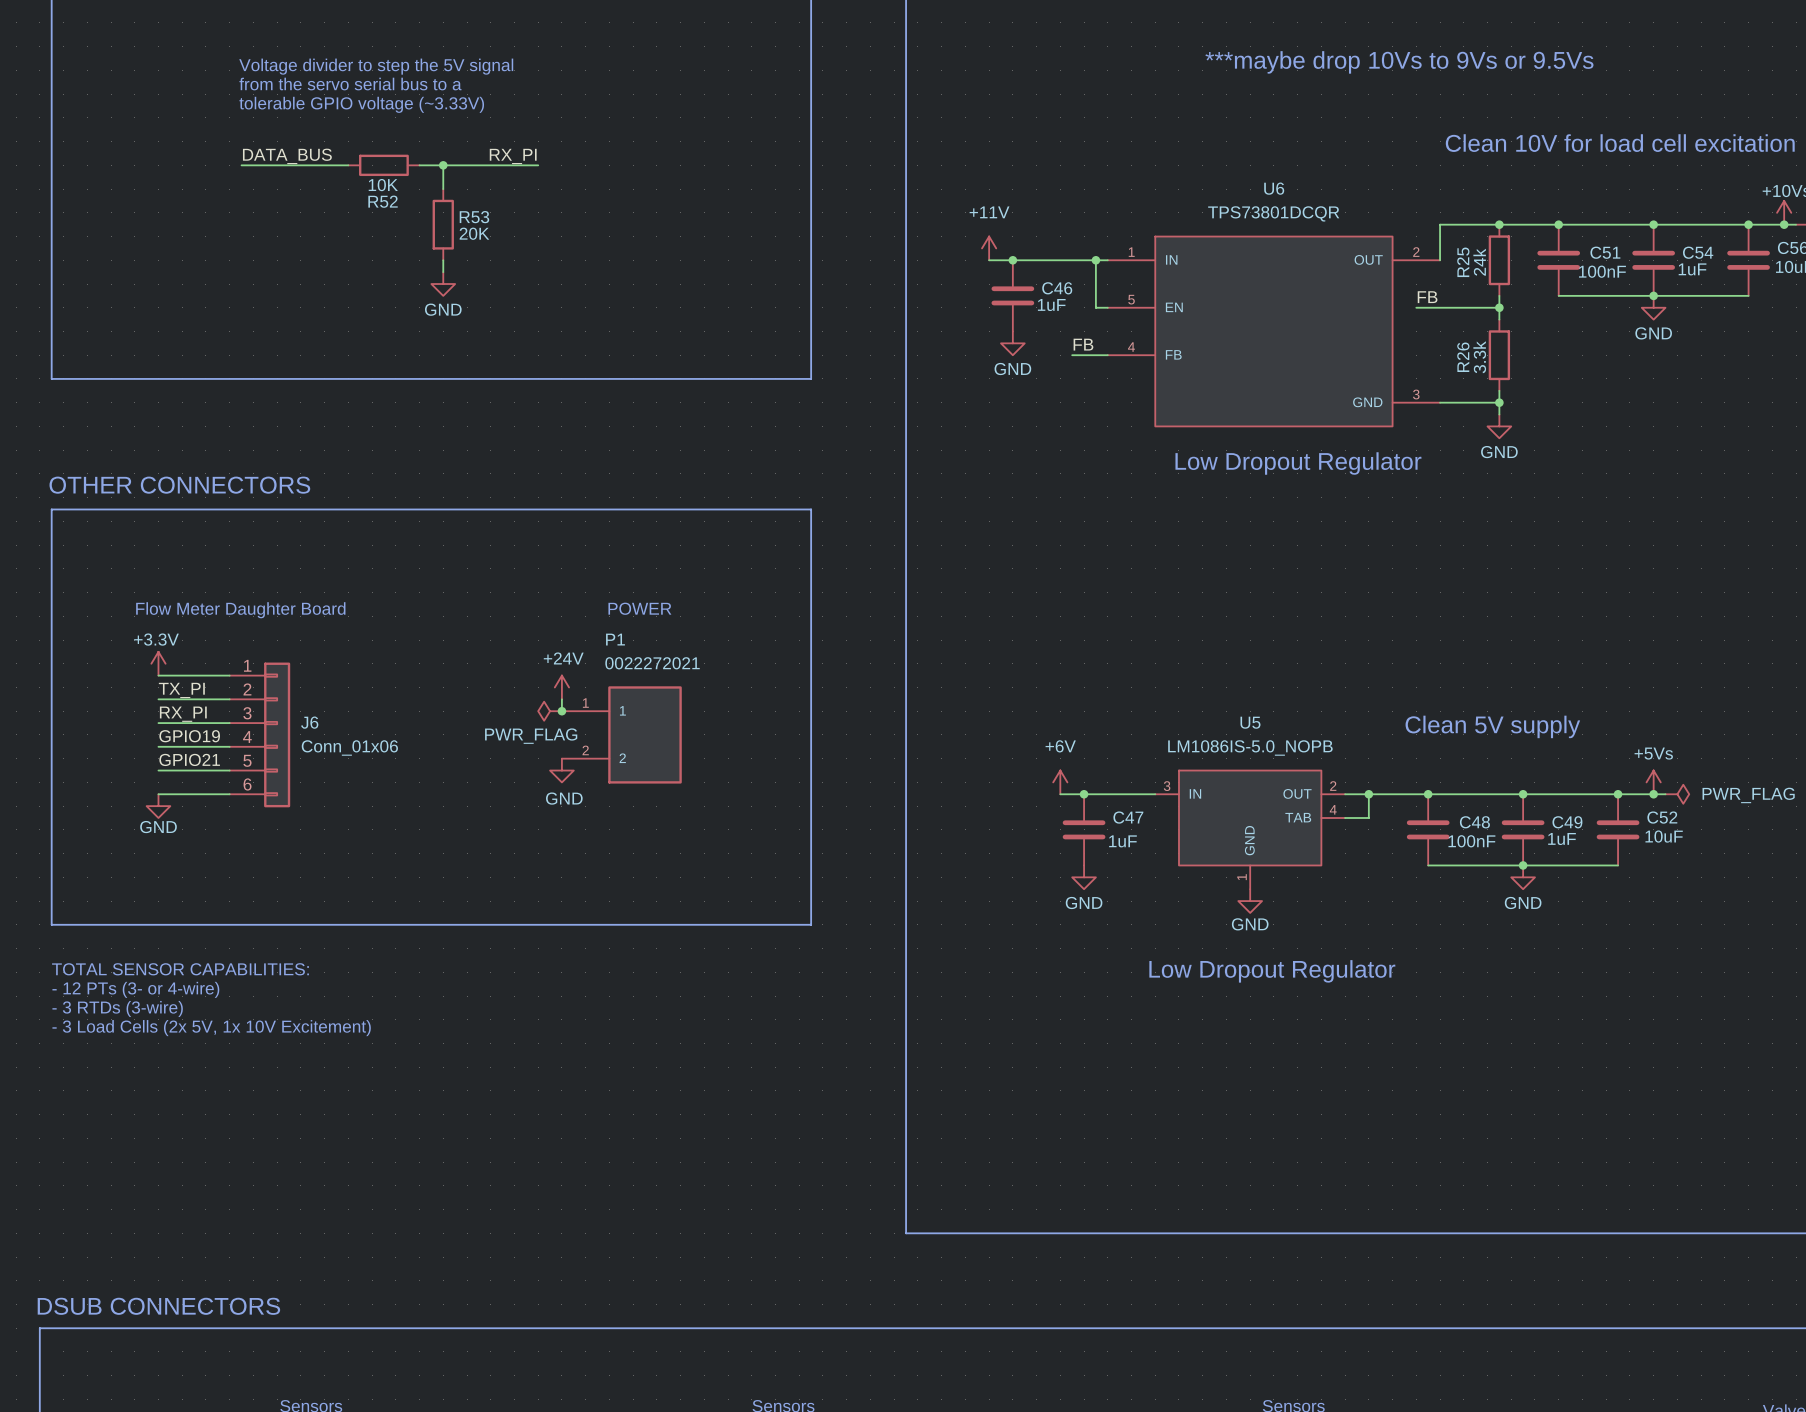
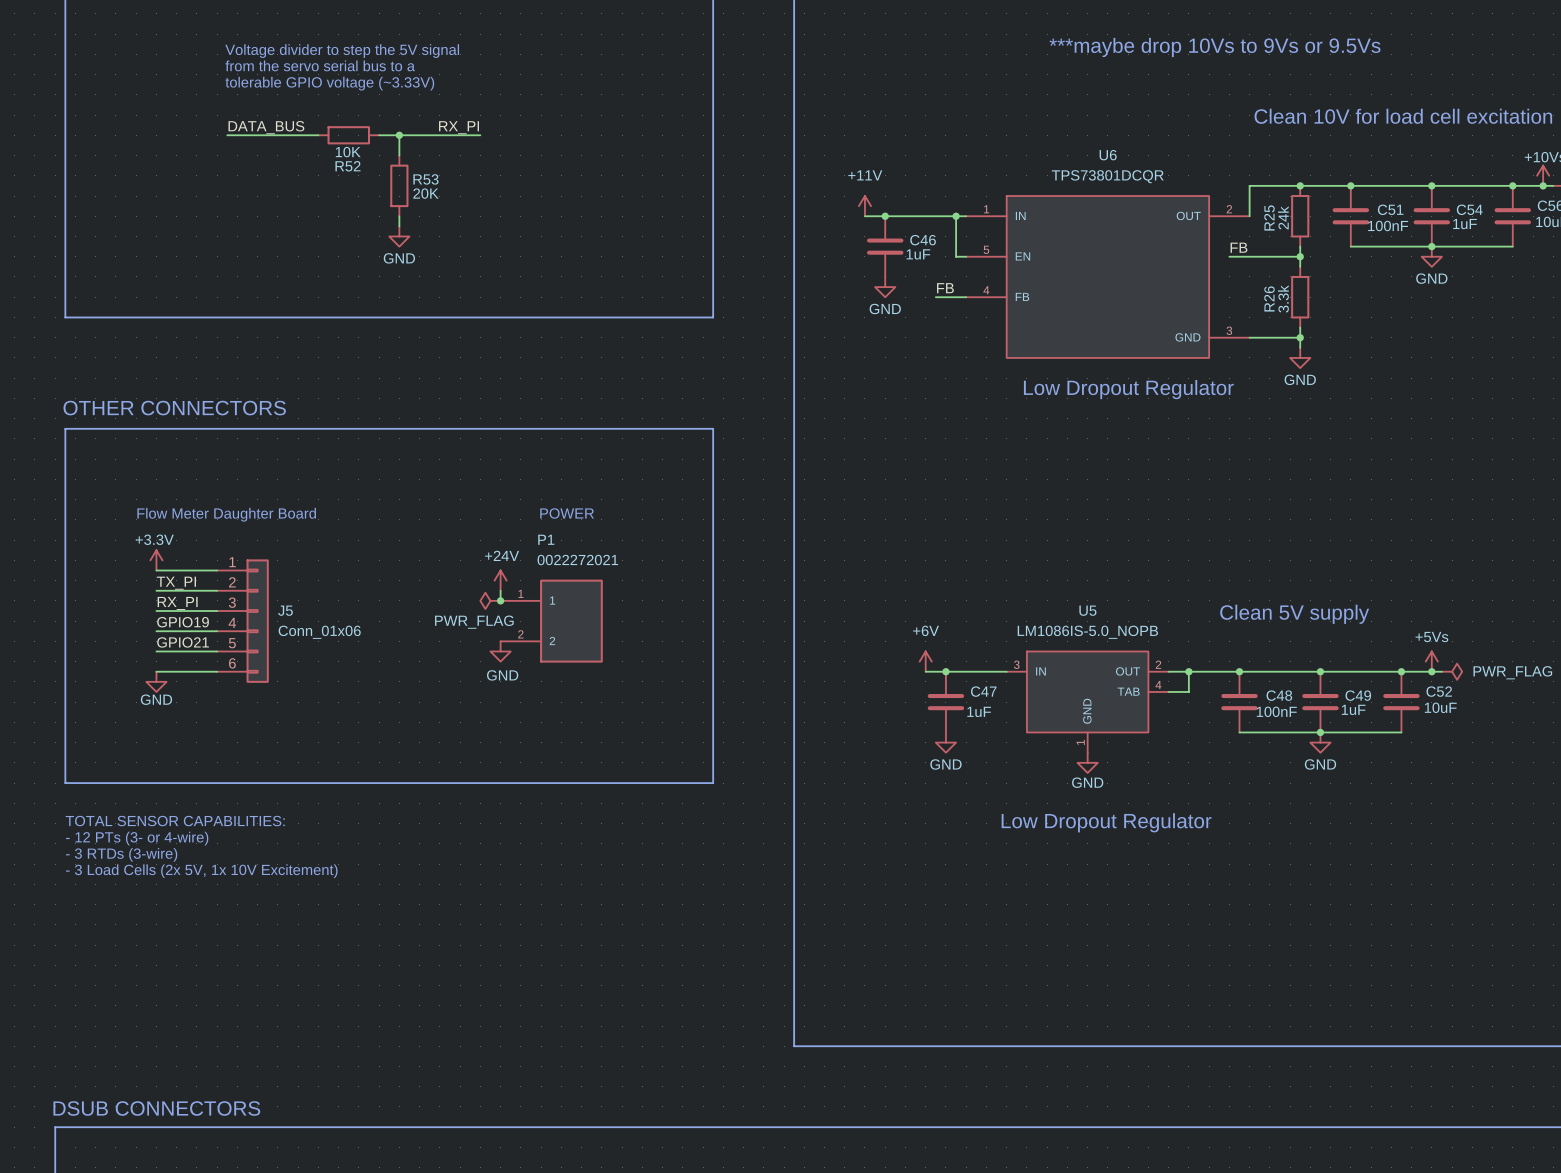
J6 name: J6 (309, 722) -> J5 (285, 610)

